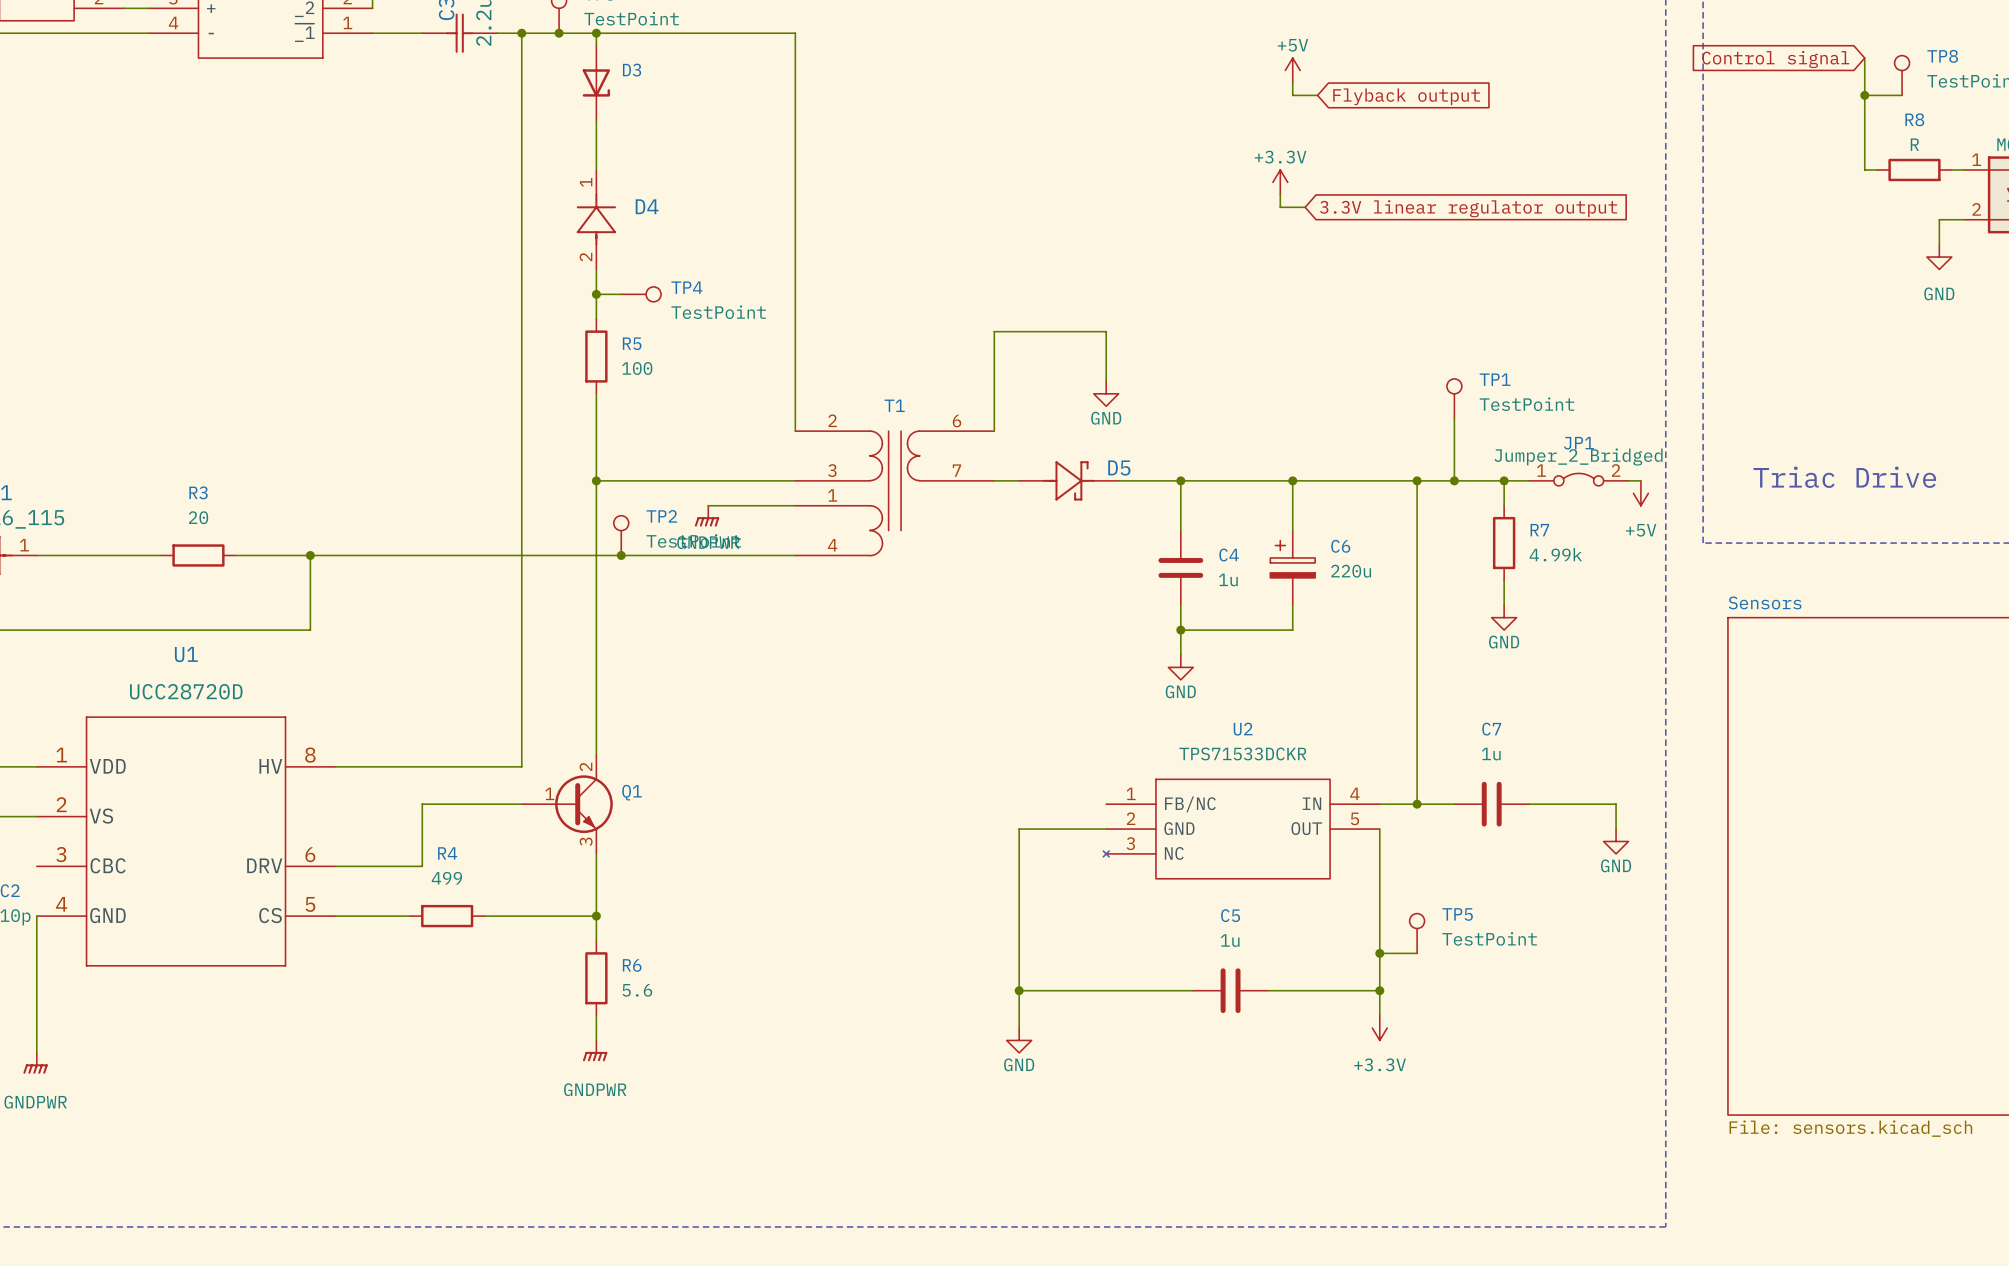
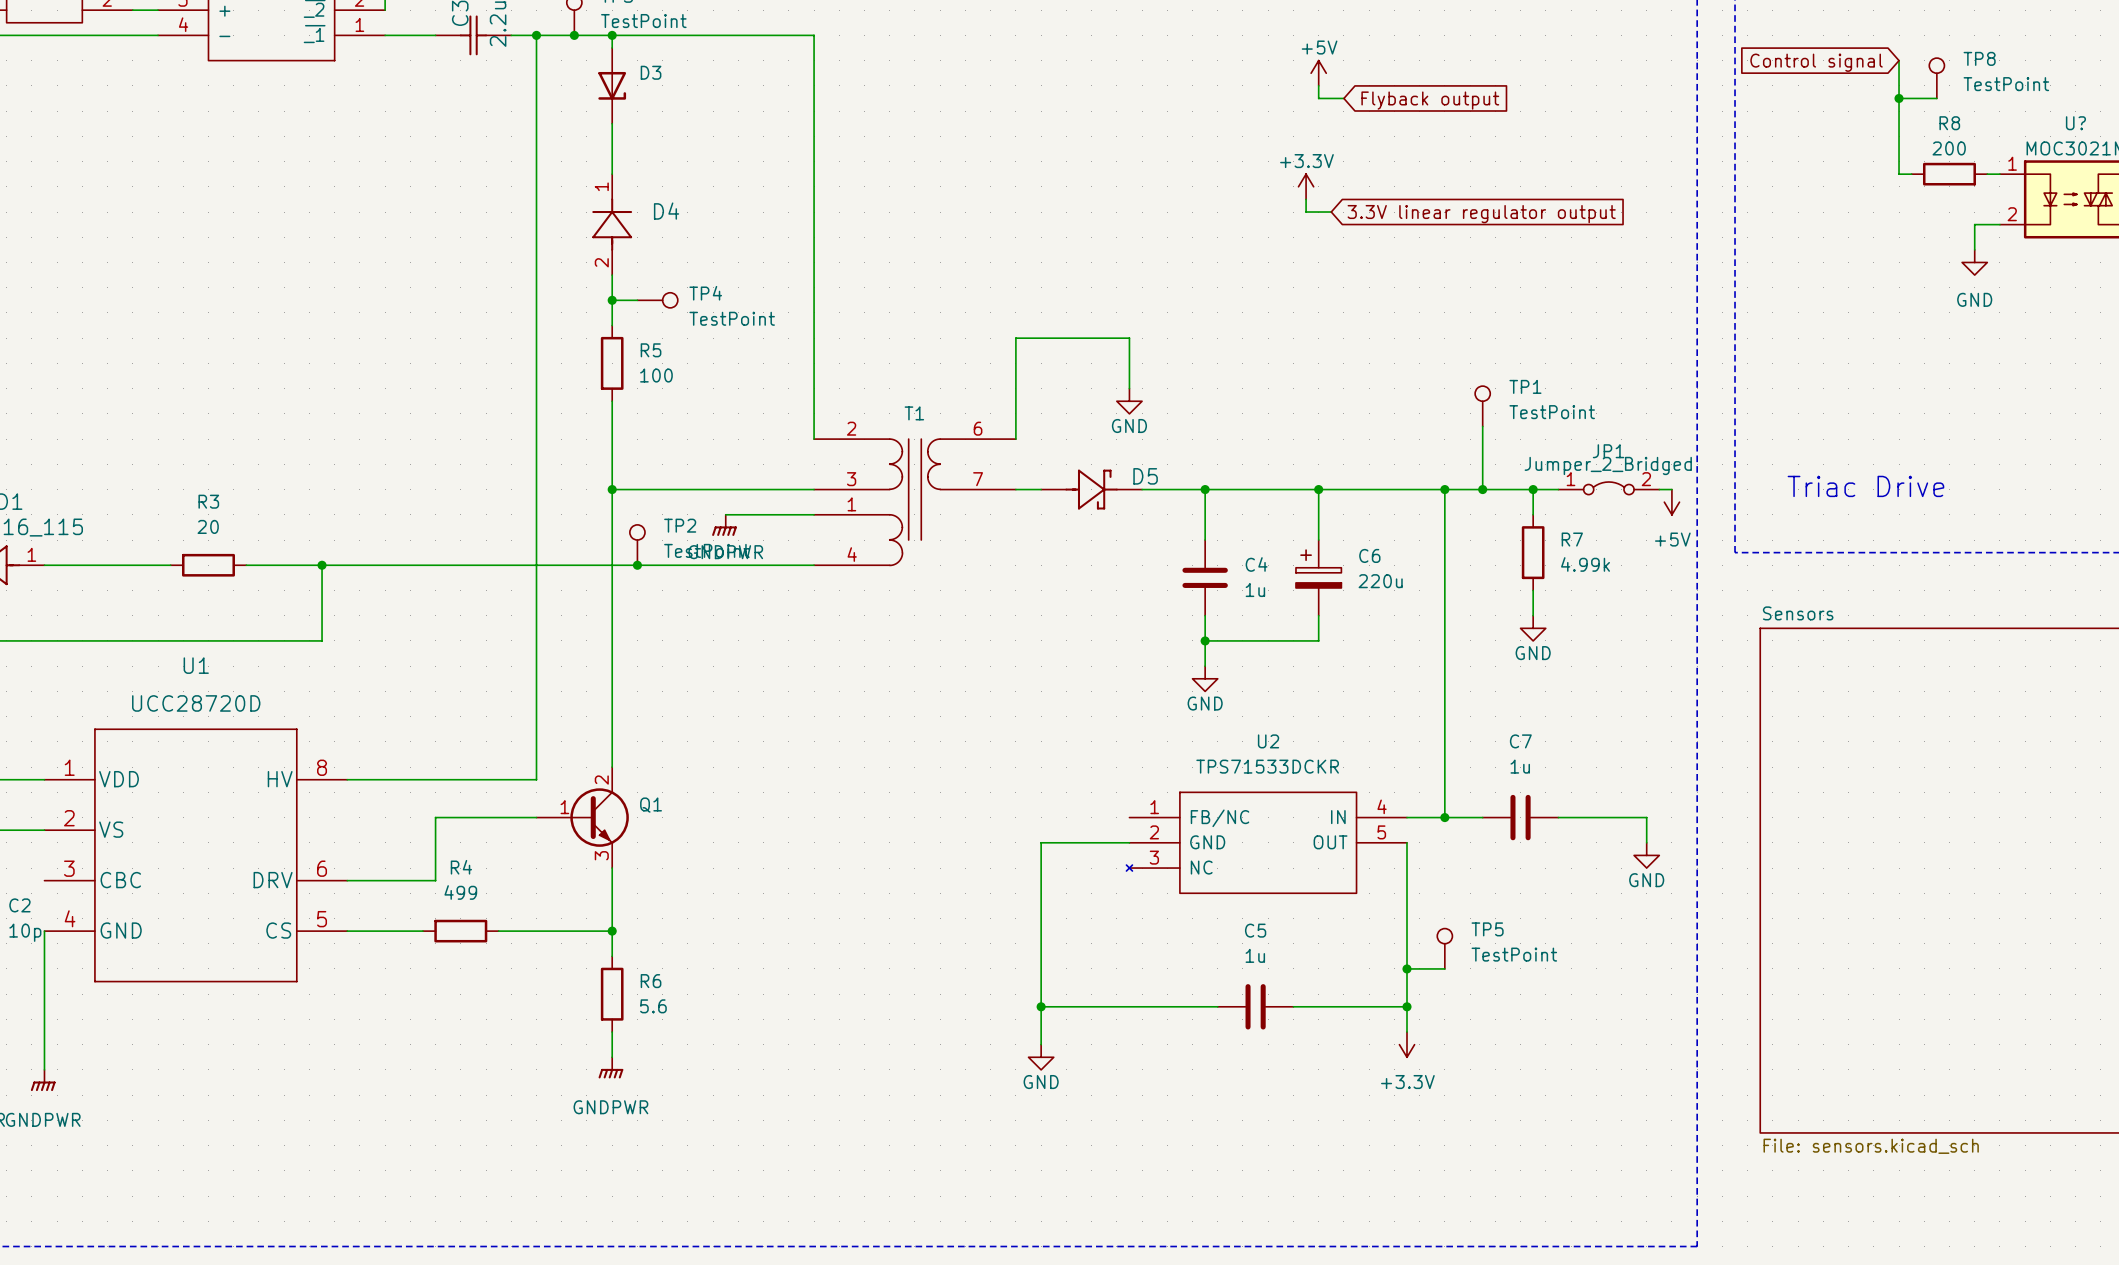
R8 value: R (1914, 144) -> 200 (1949, 148)

